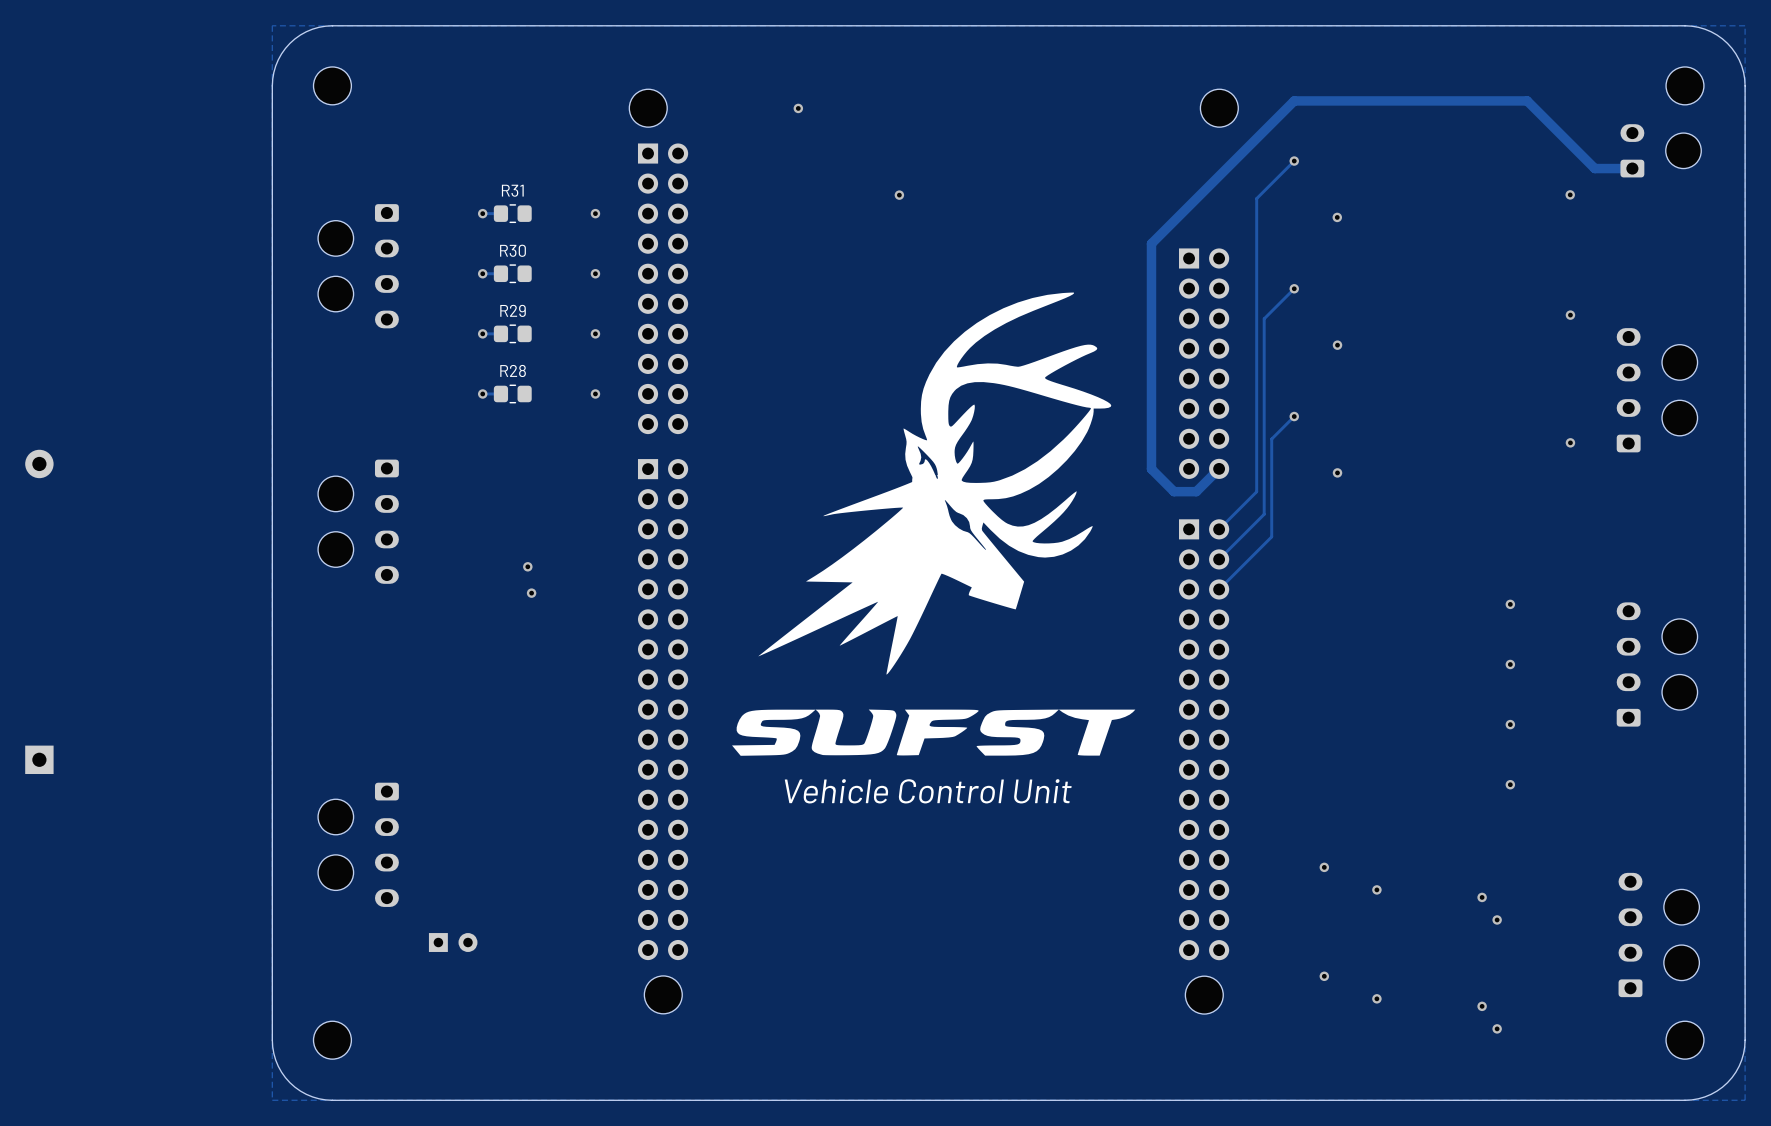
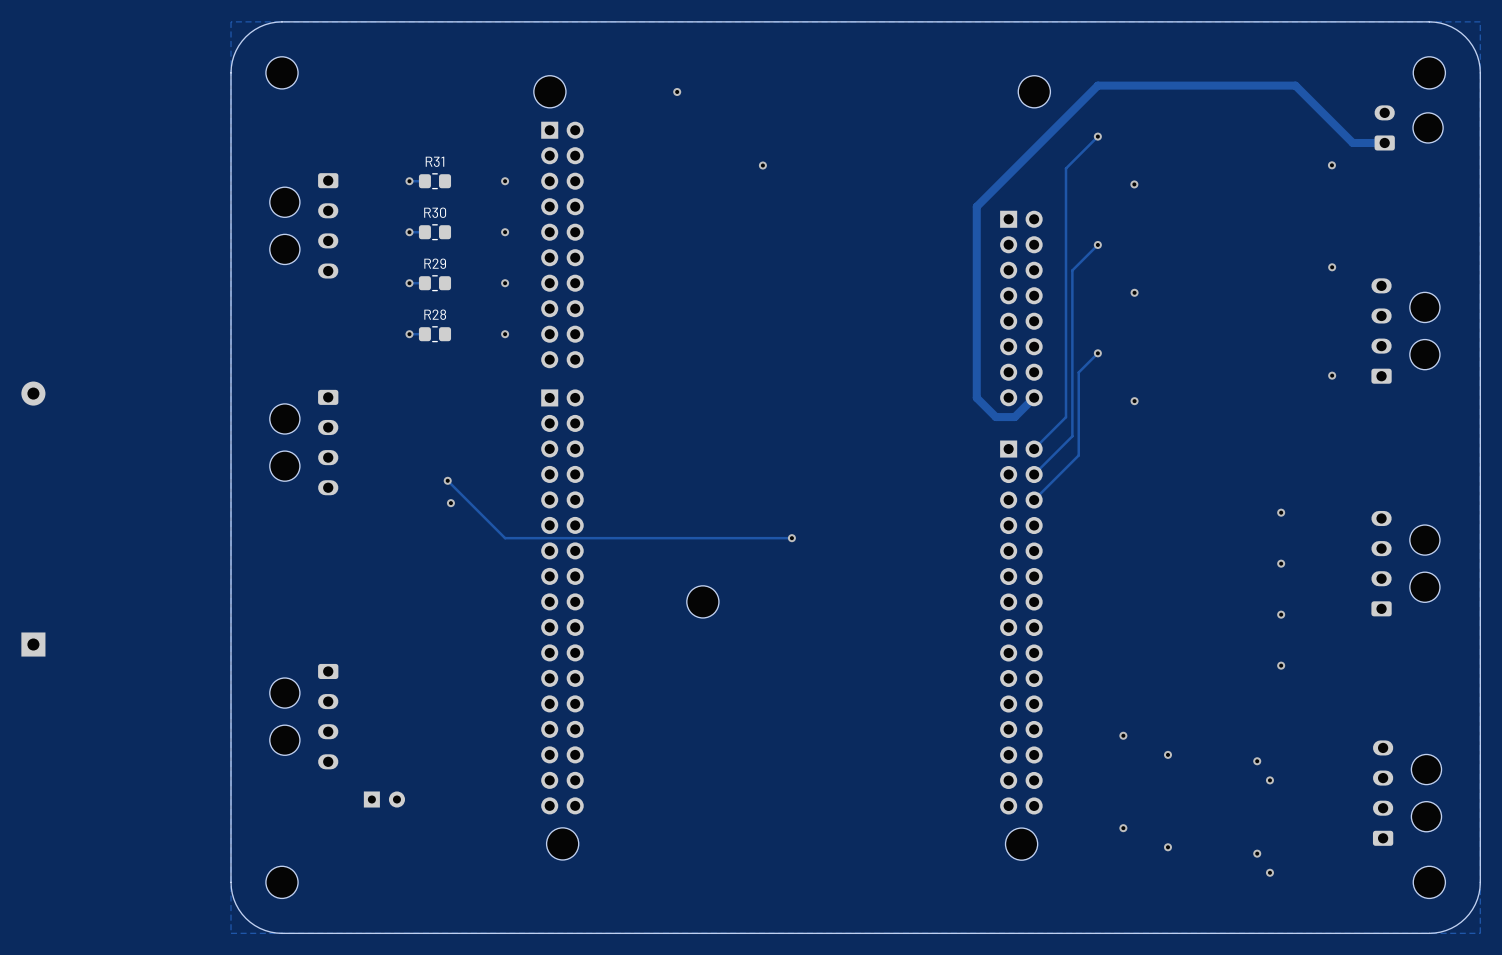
part: (934, 483) -> none
track: none -> (447, 480) (505, 538) (791, 538)
via: none -> (791, 538)
drawing: [732, 709, 1136, 756] -> none
part: none -> (702, 601)
text: Vehicle Control Unit (928, 791) -> none

